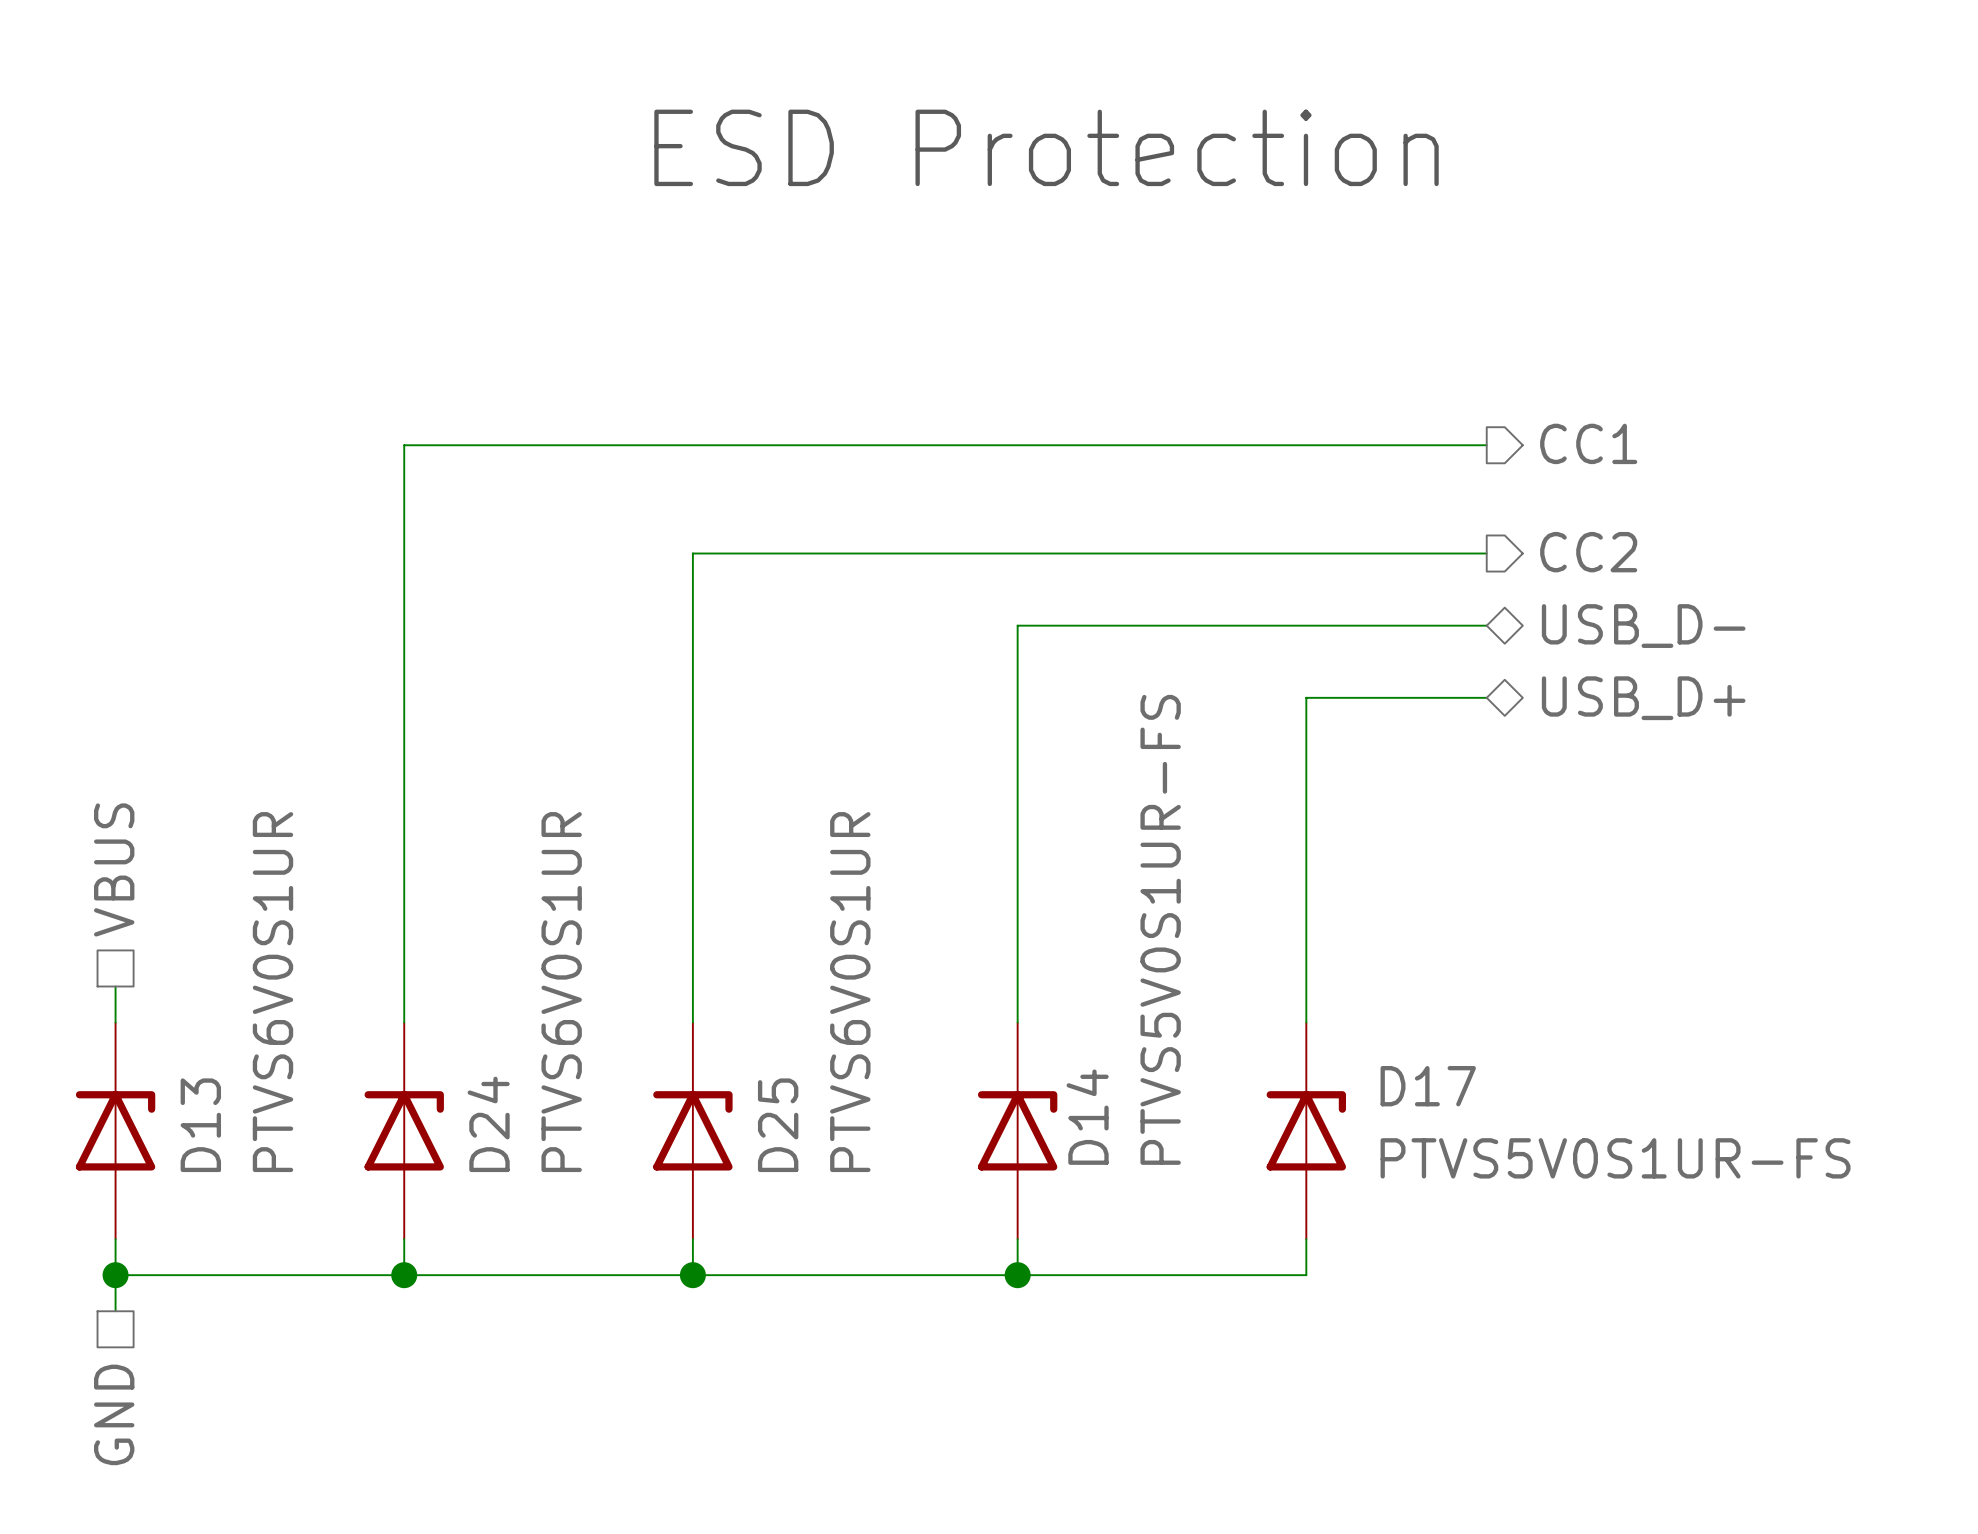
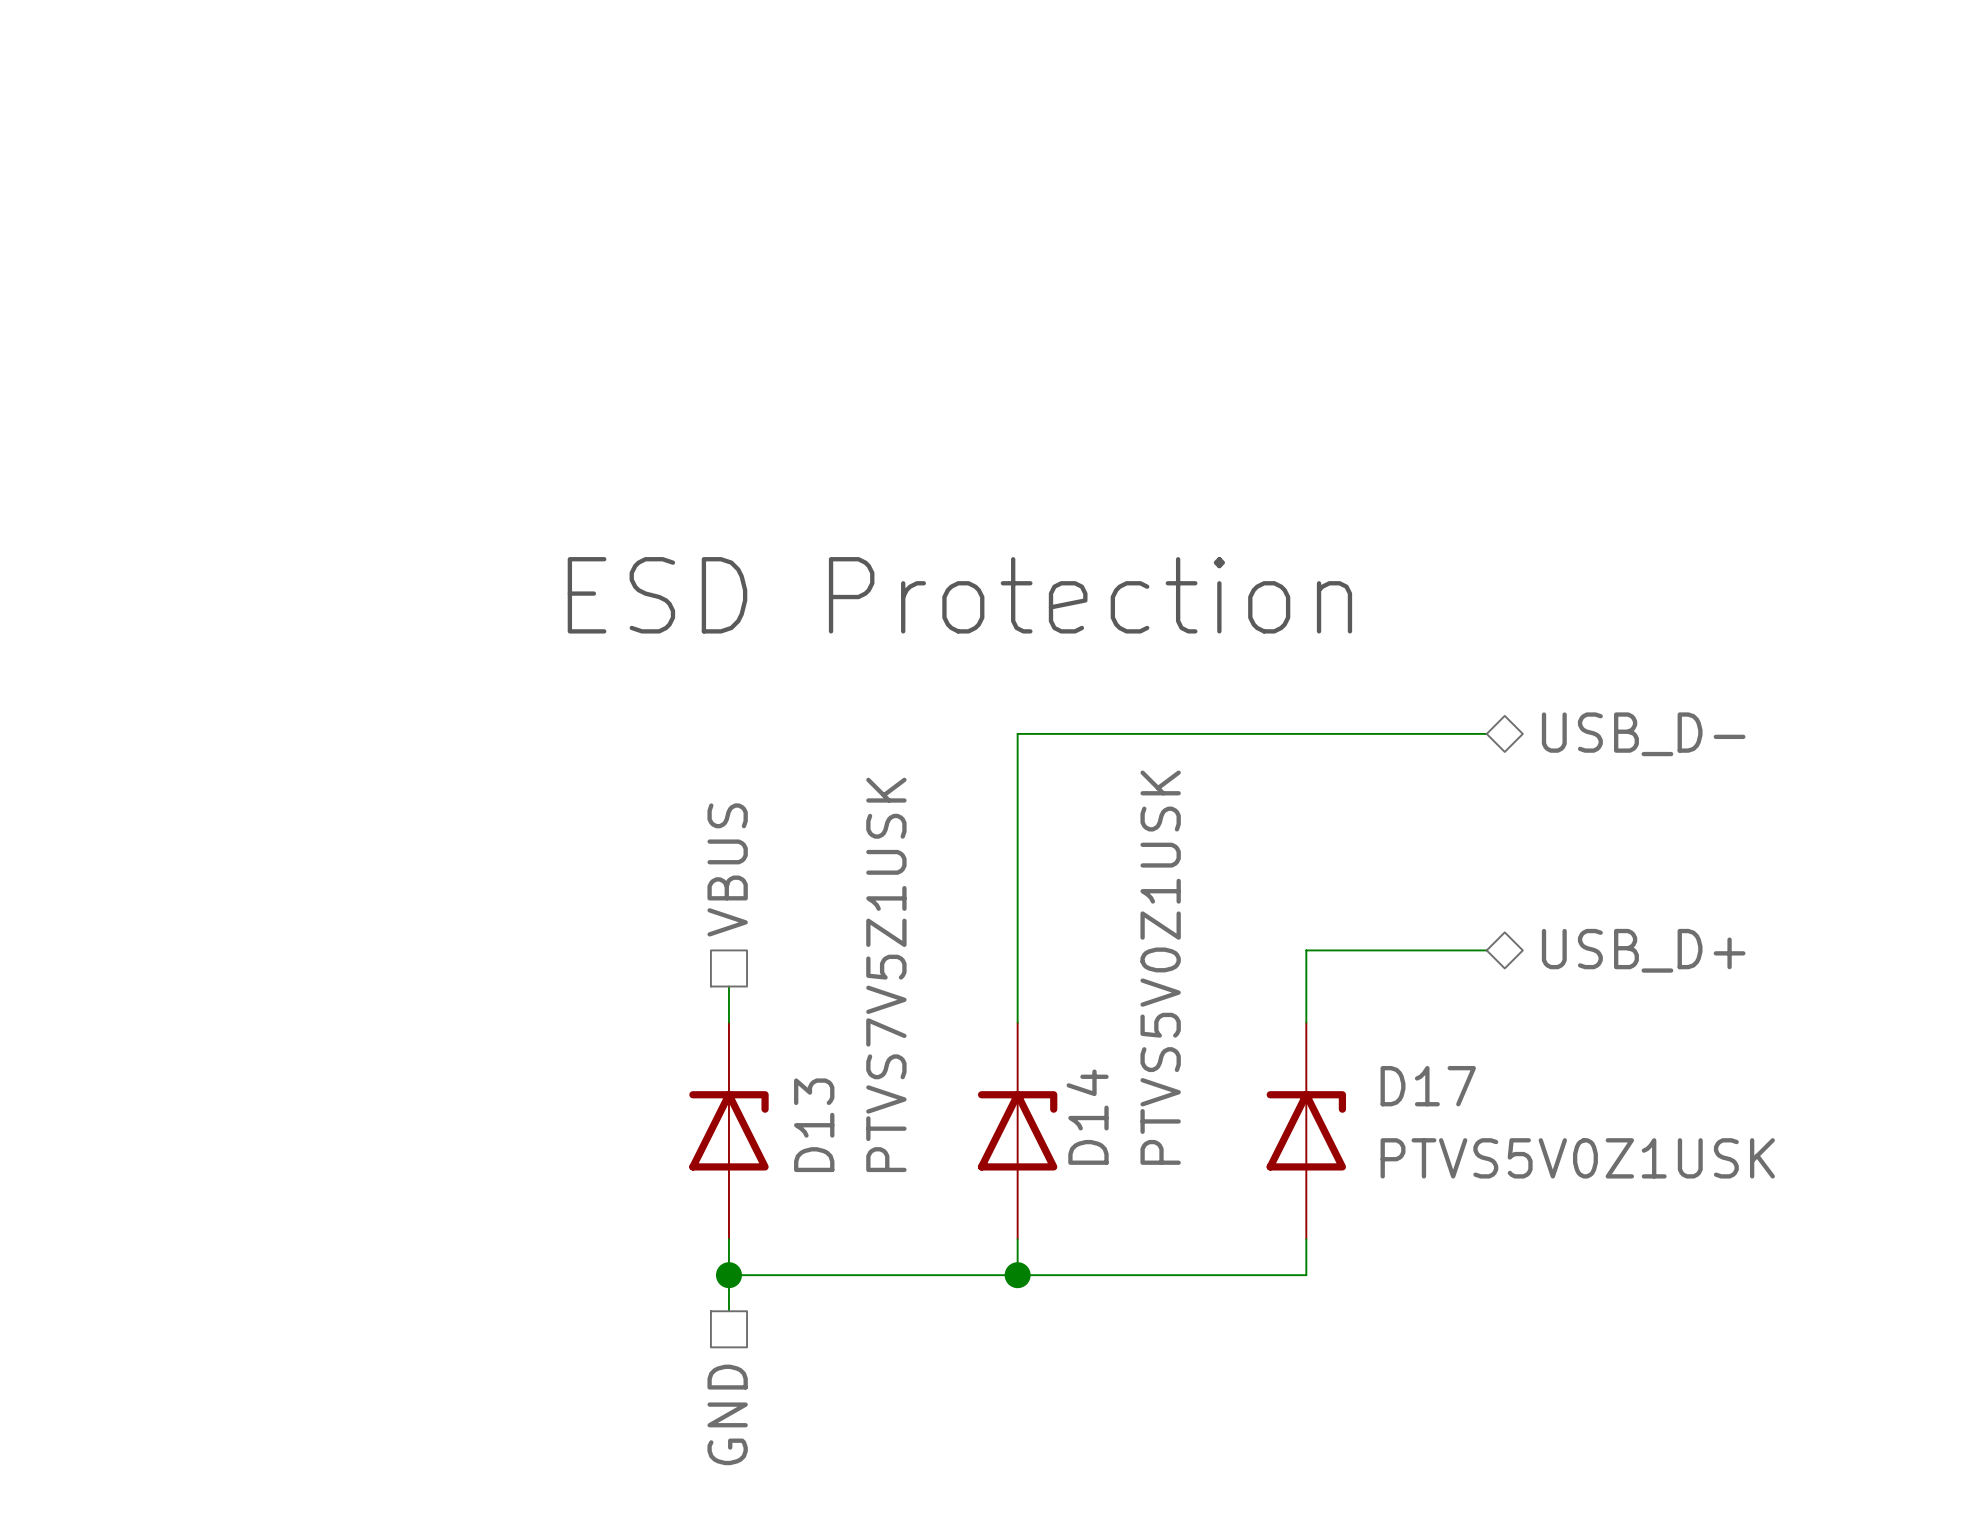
text position: ESD Protection (1046, 147) -> ESD Protection (959, 595)
hierarchical label: CC1 (1588, 443) -> none
wire: (1486, 445) (404, 445) (404, 1022) -> none
hierarchical label: CC2 (1588, 552) -> none
wire: (1486, 553) (692, 553) (692, 1022) -> none
wire: (1486, 625) (1017, 625) (1017, 733) -> (1486, 733) (1017, 733)
hierarchical label position: USB_D- (1643, 626) -> USB_D- (1643, 734)
wire: (1486, 697) (1306, 697) (1306, 950) -> (1486, 950) (1306, 950)
hierarchical label position: USB_D+ (1643, 698) -> USB_D+ (1643, 950)
hierarchical label position: VBUS (114, 869) -> VBUS (727, 869)
D14 value: PTVS5V0S1UR-FS (1160, 929) -> PTVS5V0Z1USK (1160, 967)
wire: (115, 986) (115, 1022) -> (728, 986) (728, 1022)
D13 value: PTVS6V0S1UR (272, 992) -> PTVS7V5Z1USK (886, 974)
D13 position: (115, 1130) -> (728, 1130)
D24: PTVS6V0S1UR (404, 1130) -> none
D25: PTVS6V0S1UR (692, 1130) -> none
D17 value: PTVS5V0S1UR-FS (1615, 1158) -> PTVS5V0Z1USK (1577, 1158)
wire: (115, 1239) (115, 1311) -> (728, 1239) (728, 1311)
wire: (404, 1239) (404, 1275) -> none
wire: (692, 1239) (692, 1275) -> none
wire: (115, 1275) (728, 1275) -> none
junction: (115, 1275) -> none
junction: (404, 1275) -> none
junction position: (692, 1275) -> (728, 1275)
hierarchical label position: GND (114, 1414) -> GND (727, 1414)

